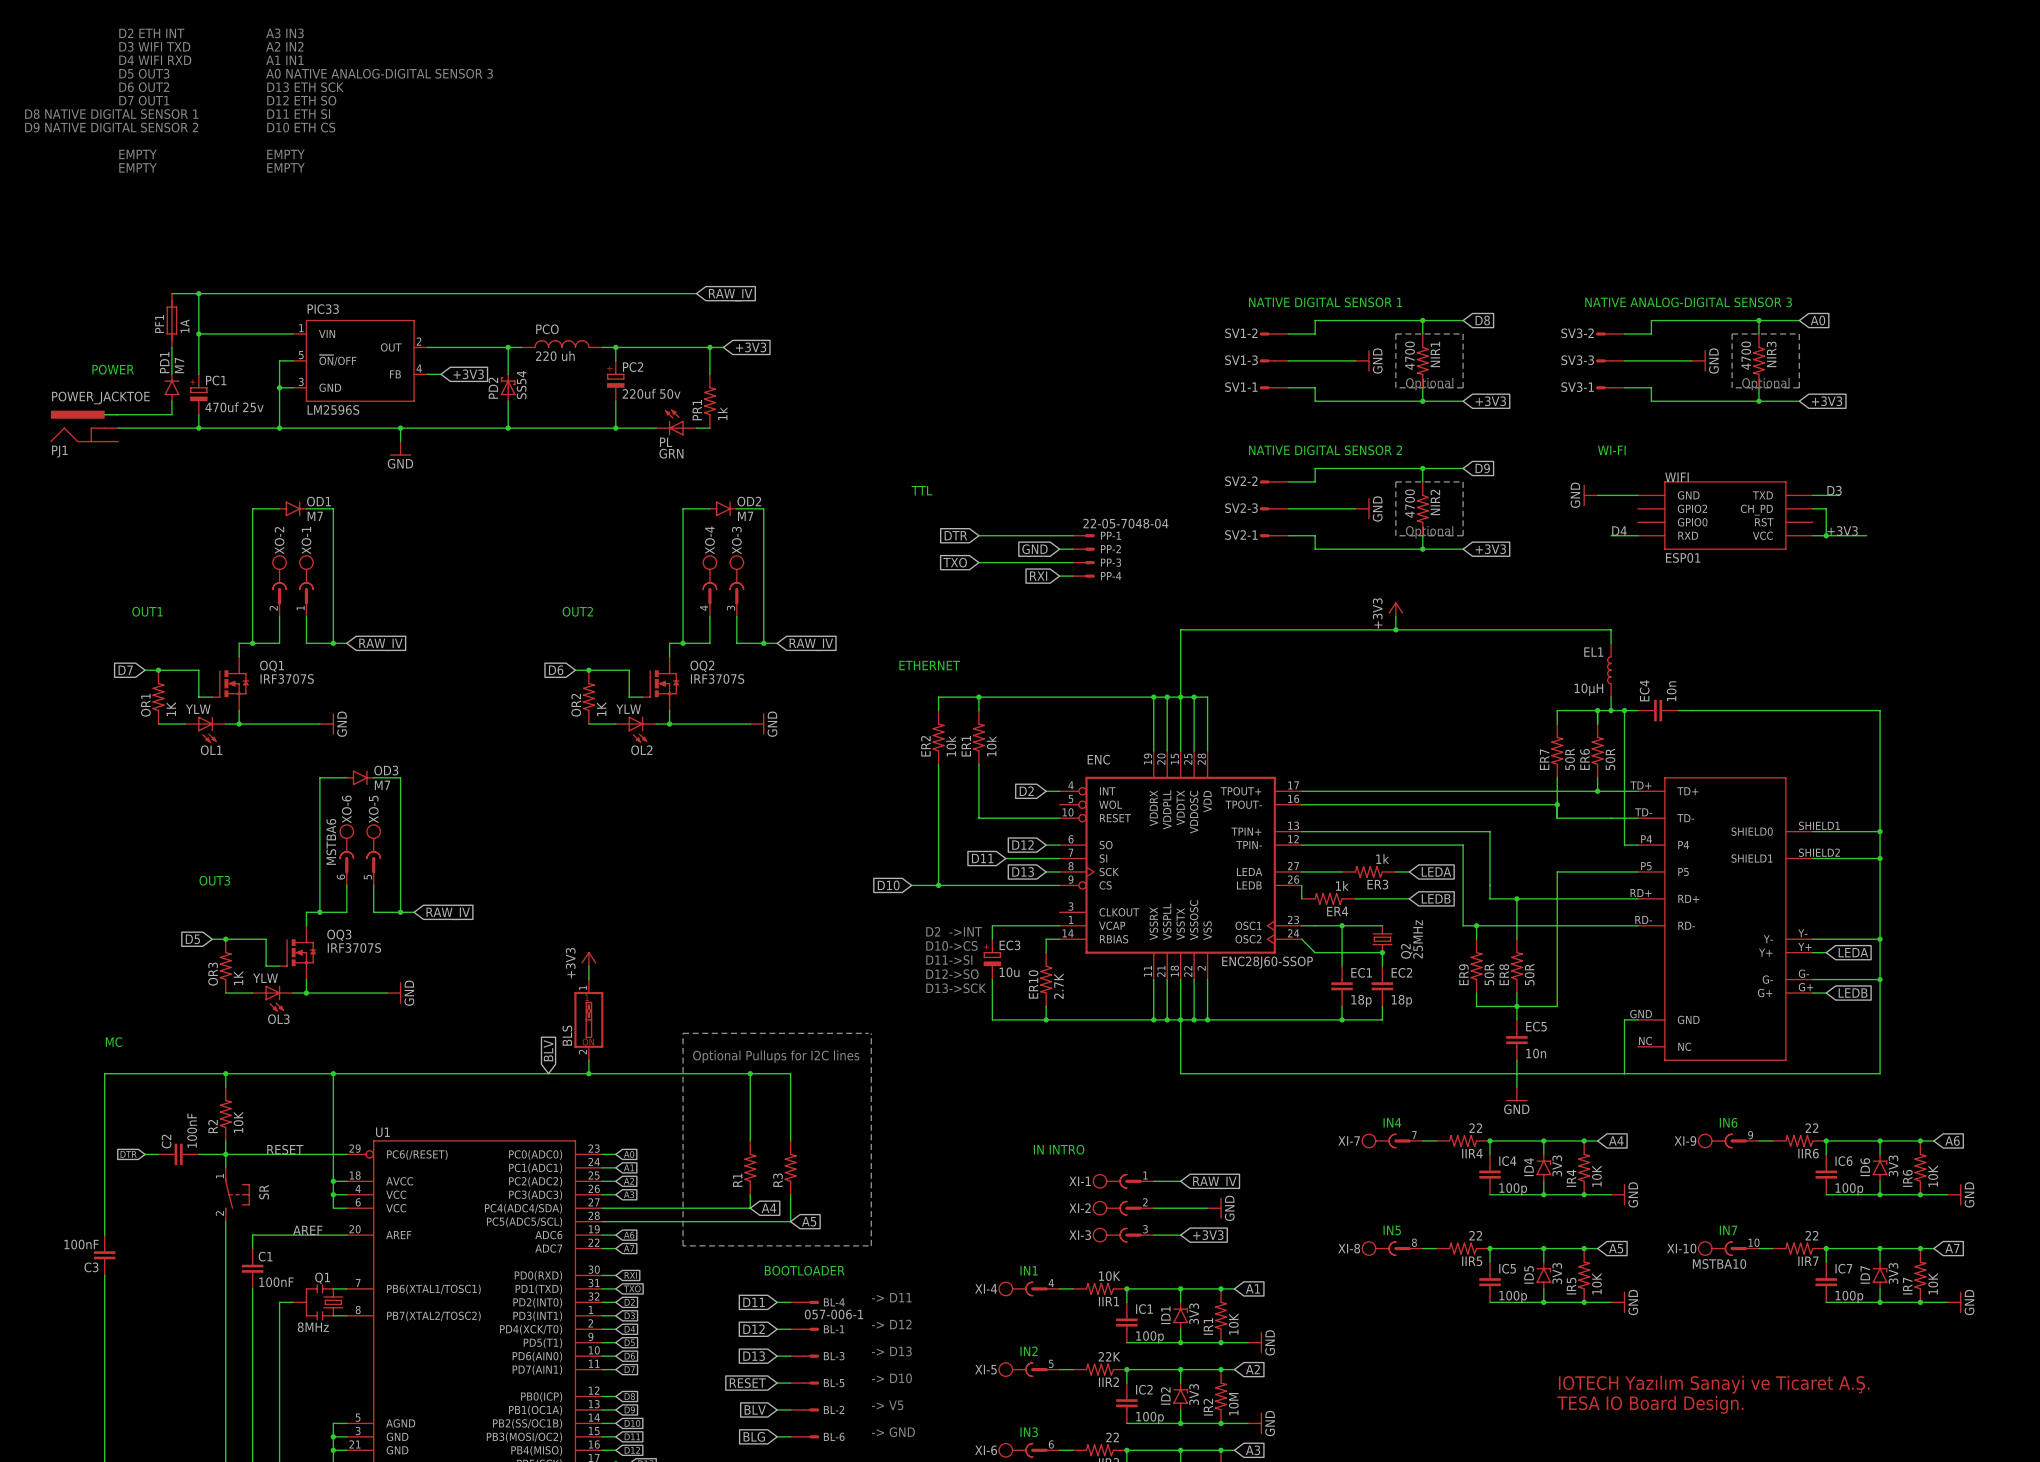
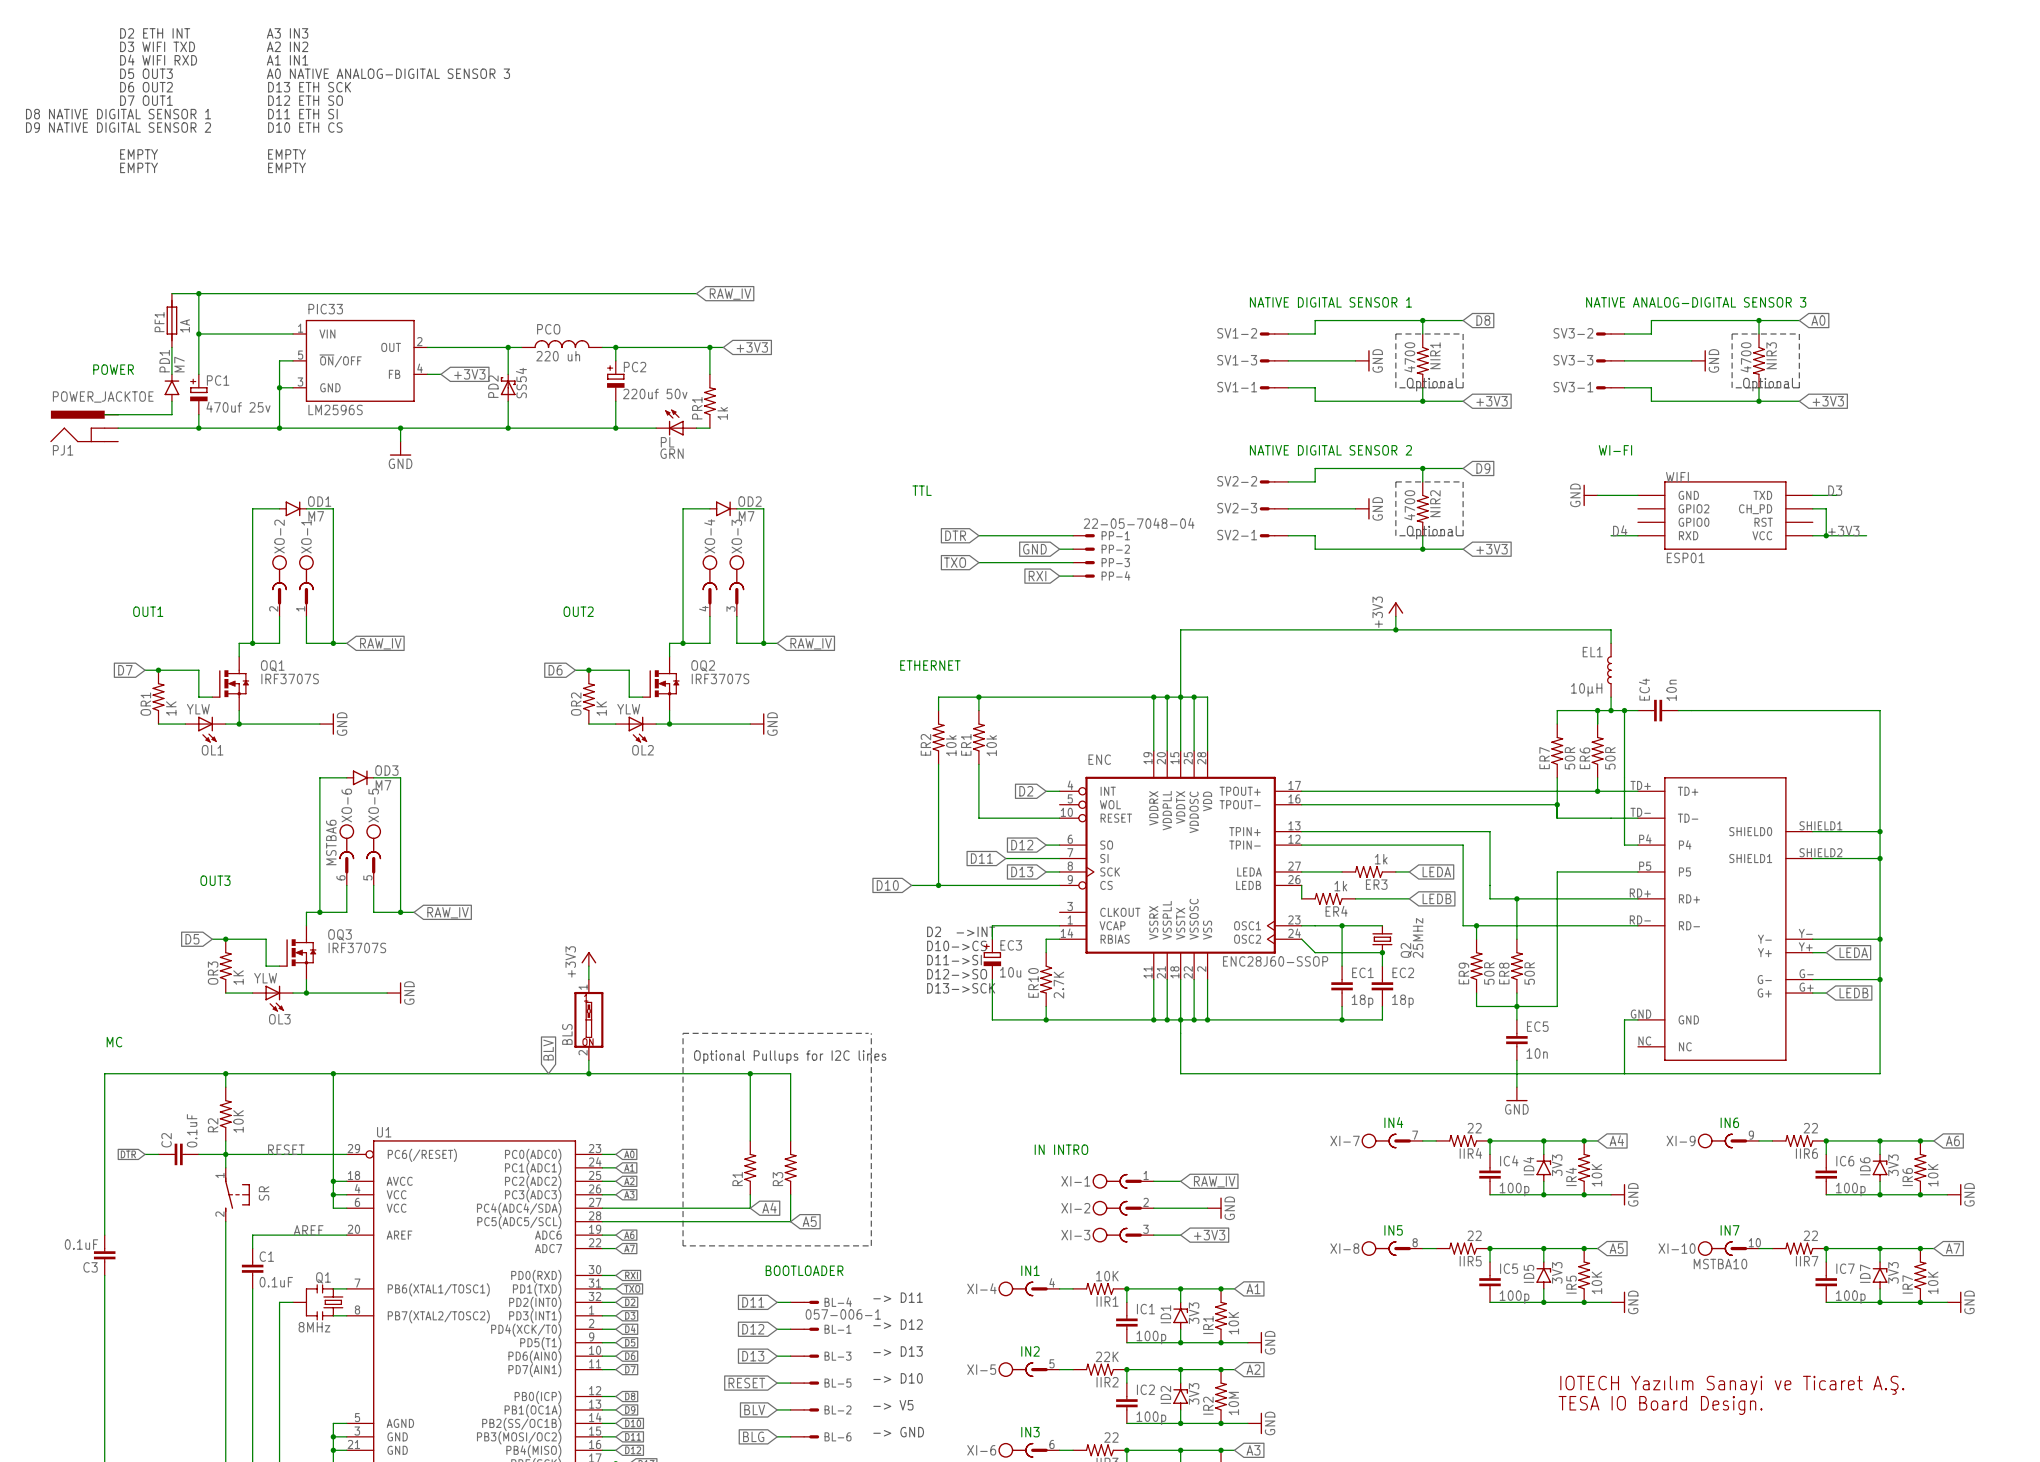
C2 value: 100nF (192, 1130) -> 0.1uF (192, 1130)
C3 value: 100nF (81, 1244) -> 0.1uF (81, 1244)
C1 value: 100nF (276, 1282) -> 0.1uF (276, 1282)

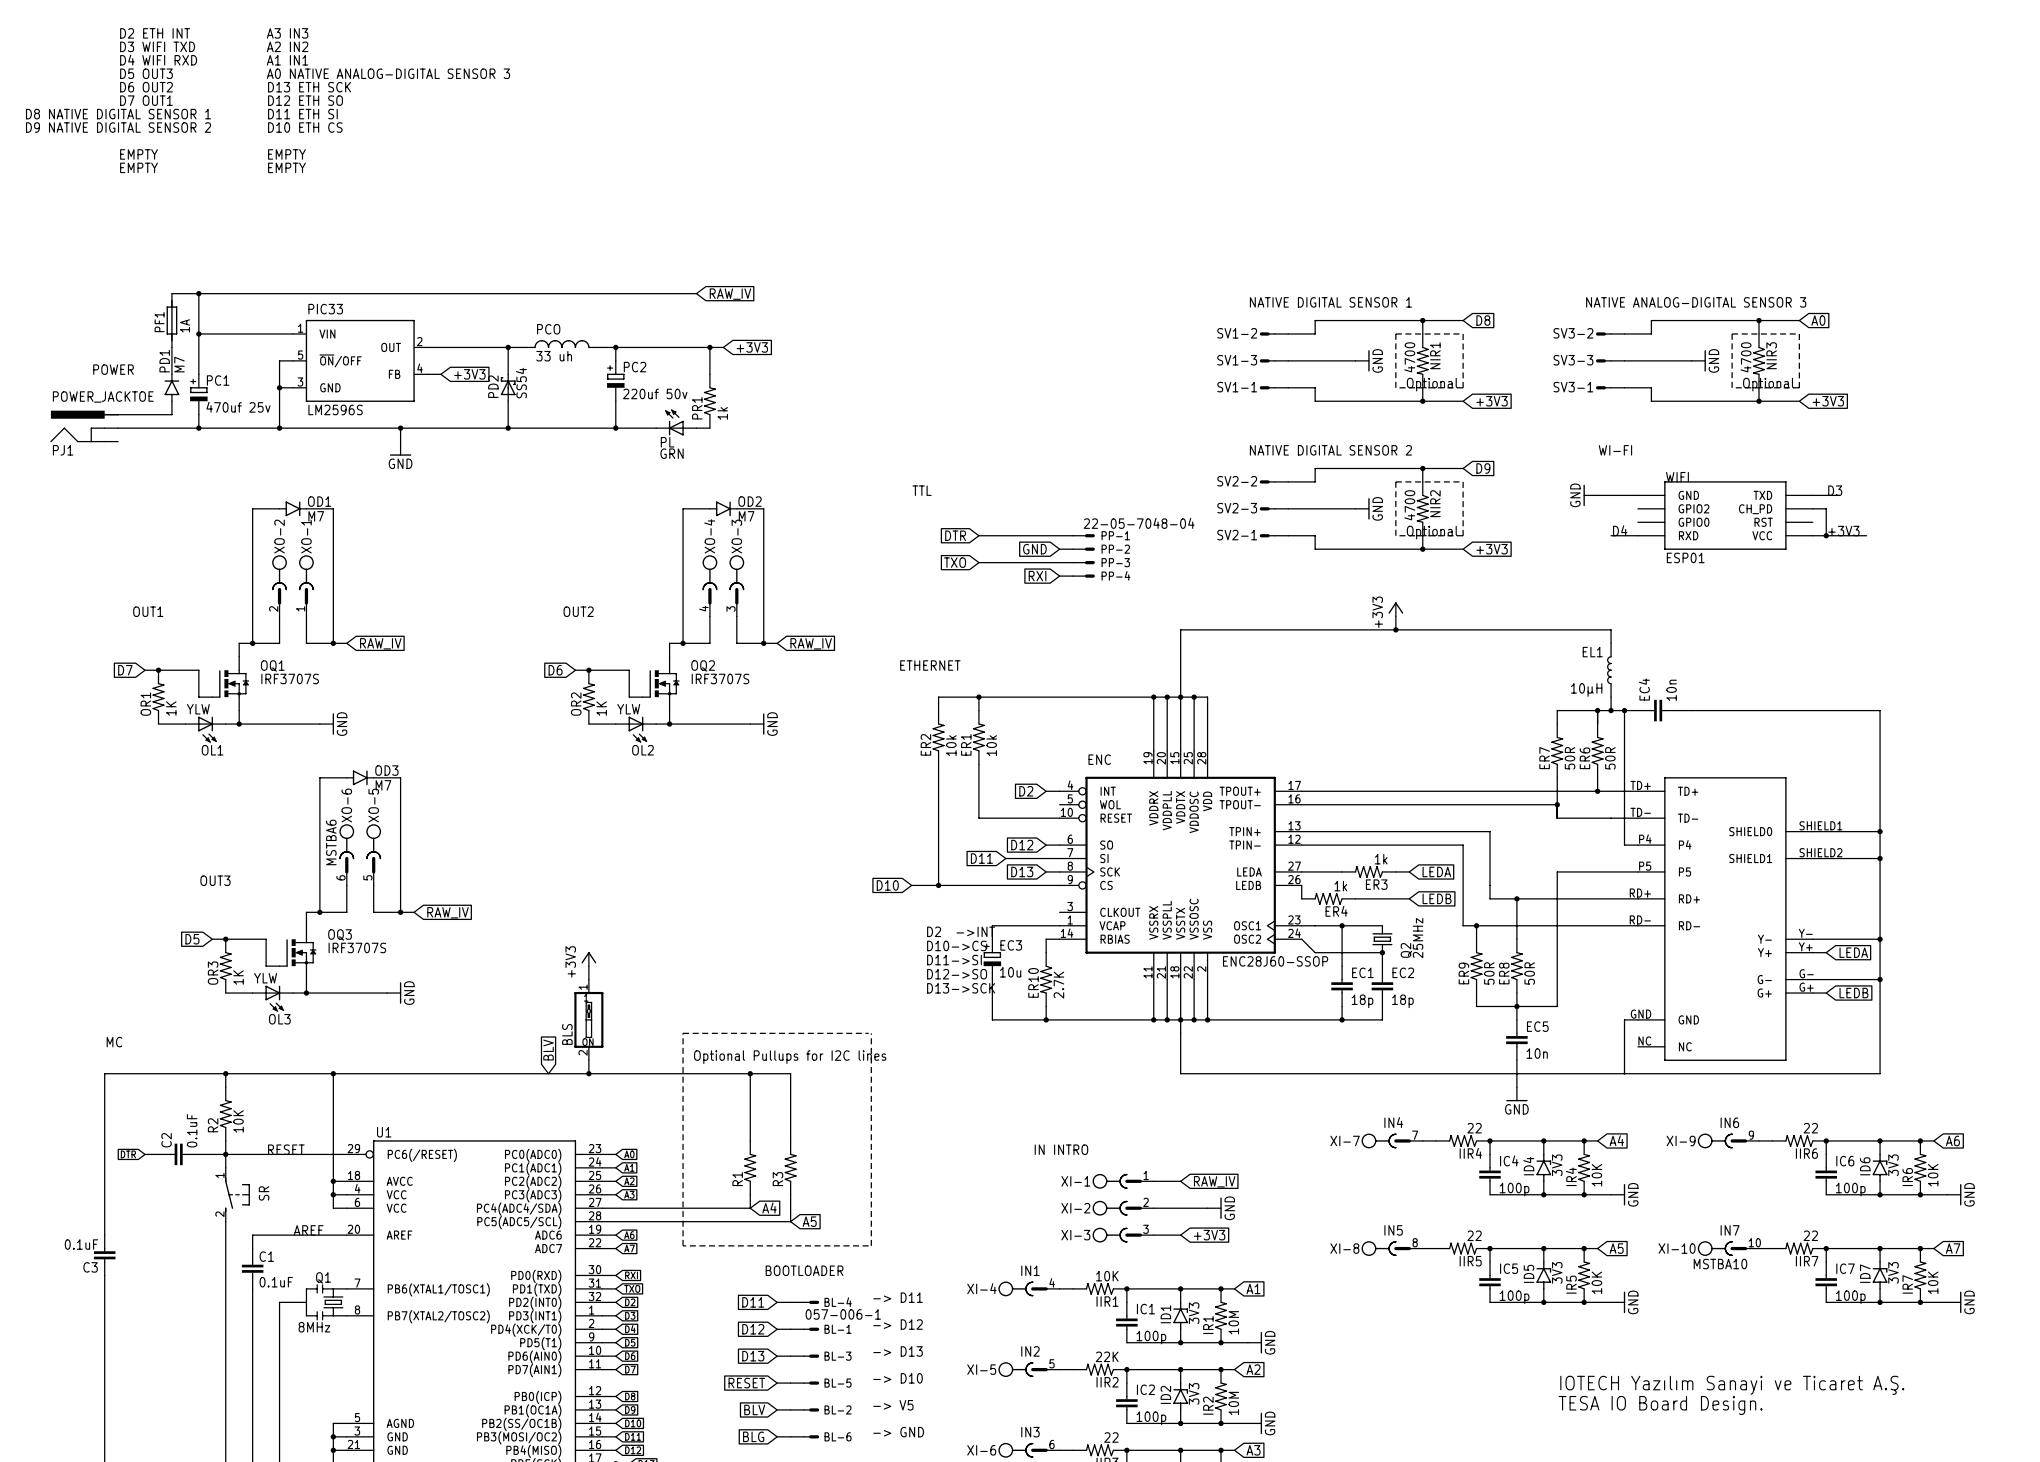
PCO value: 220 uh (558, 356) -> 33 uh (554, 356)
IR1 value: 10K (1233, 1323) -> 10M (1233, 1322)

